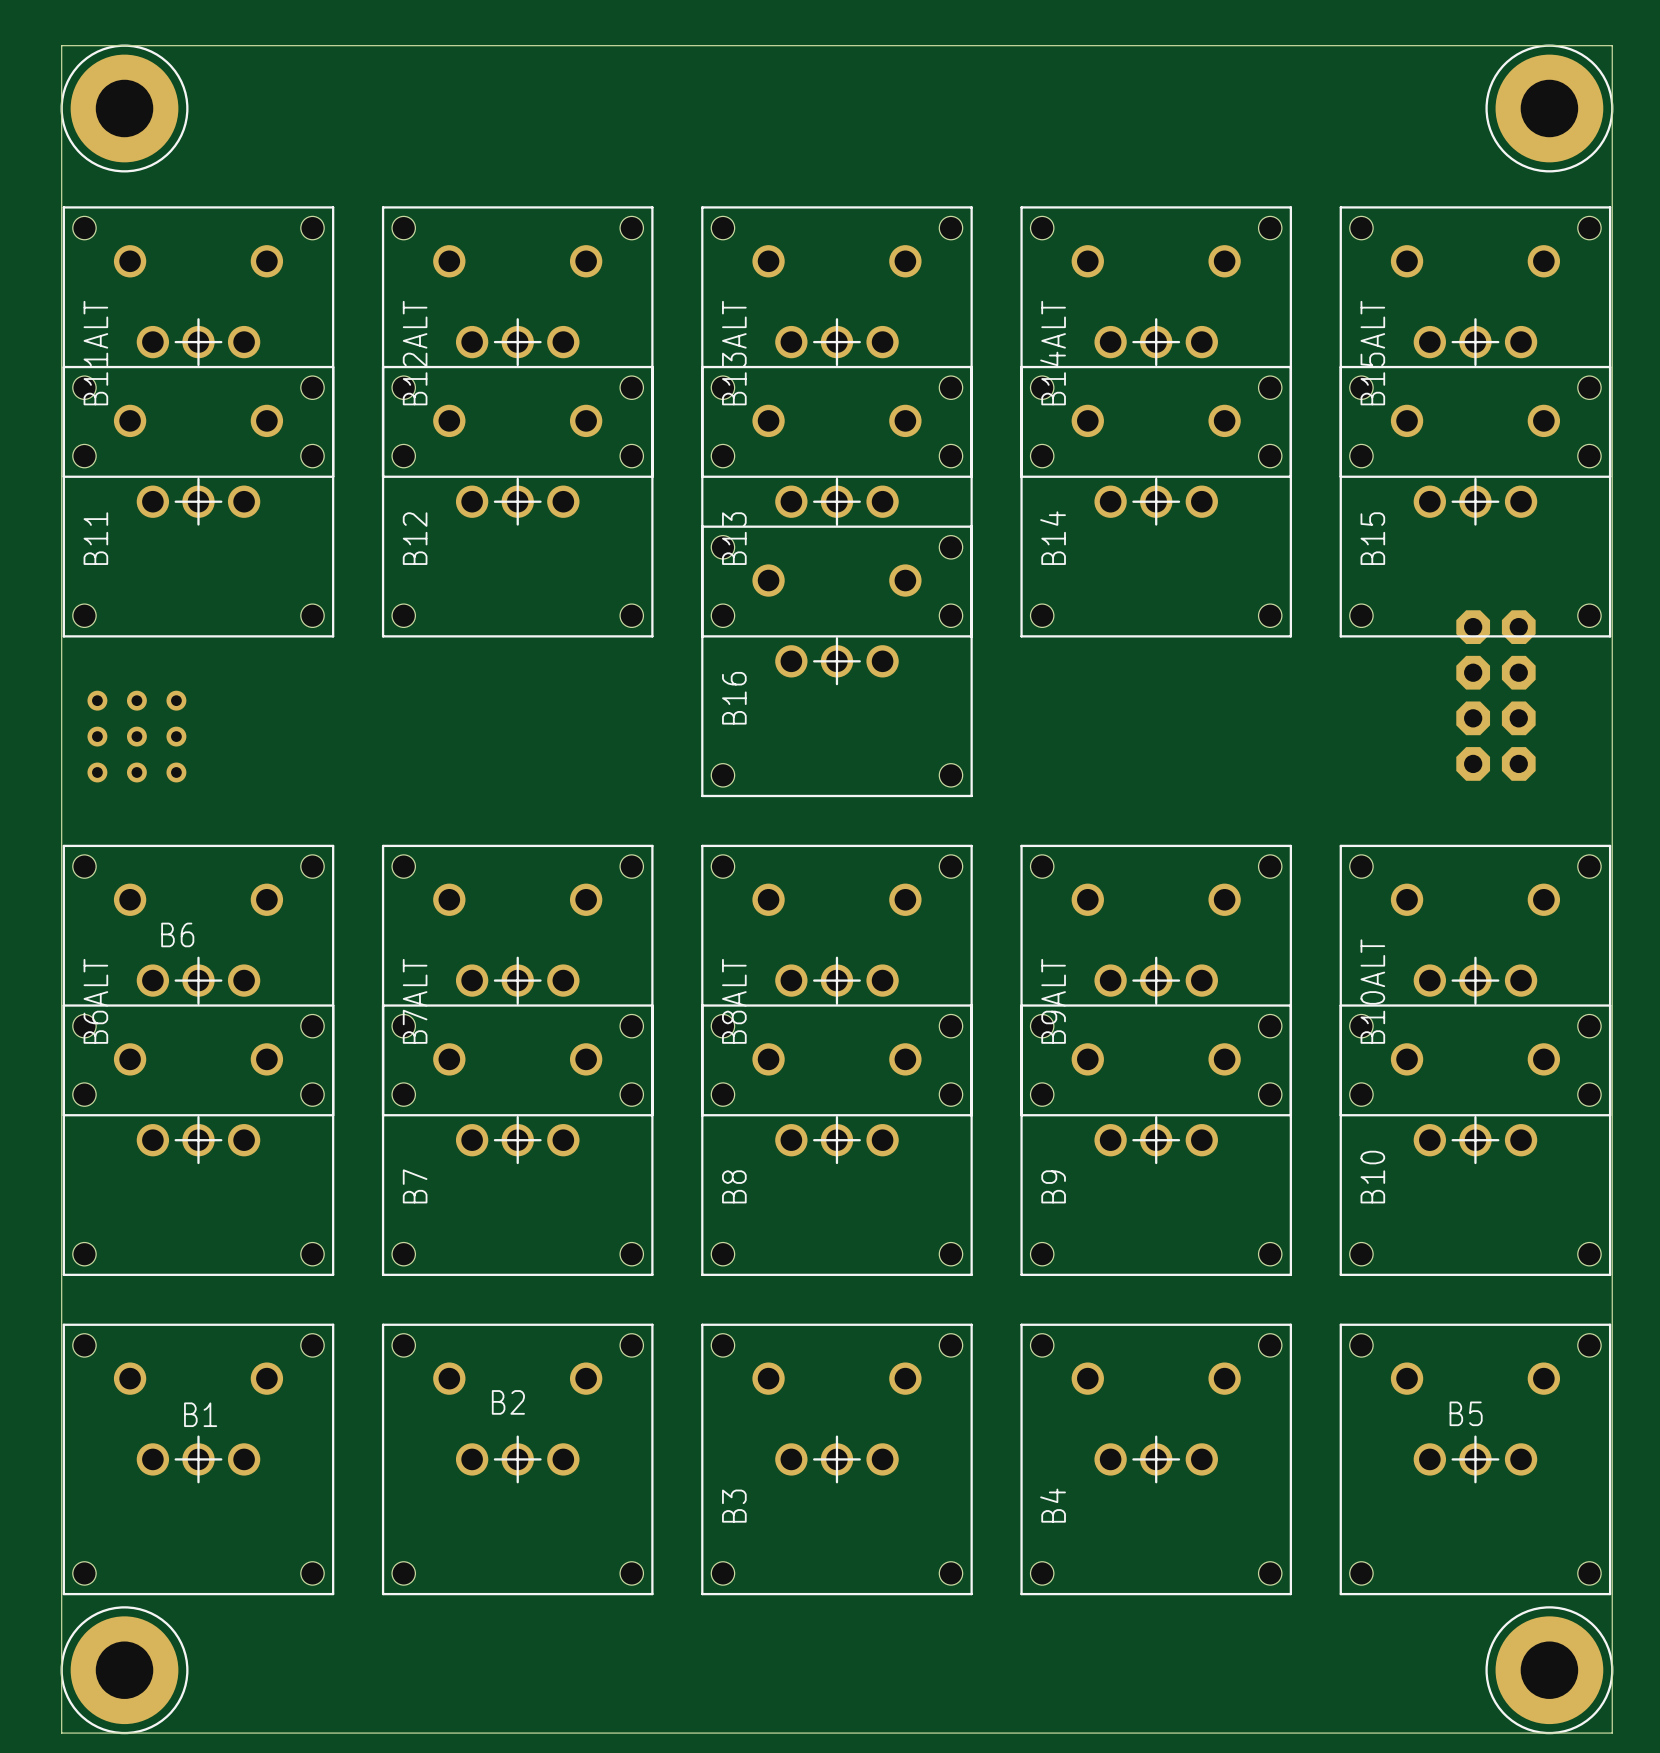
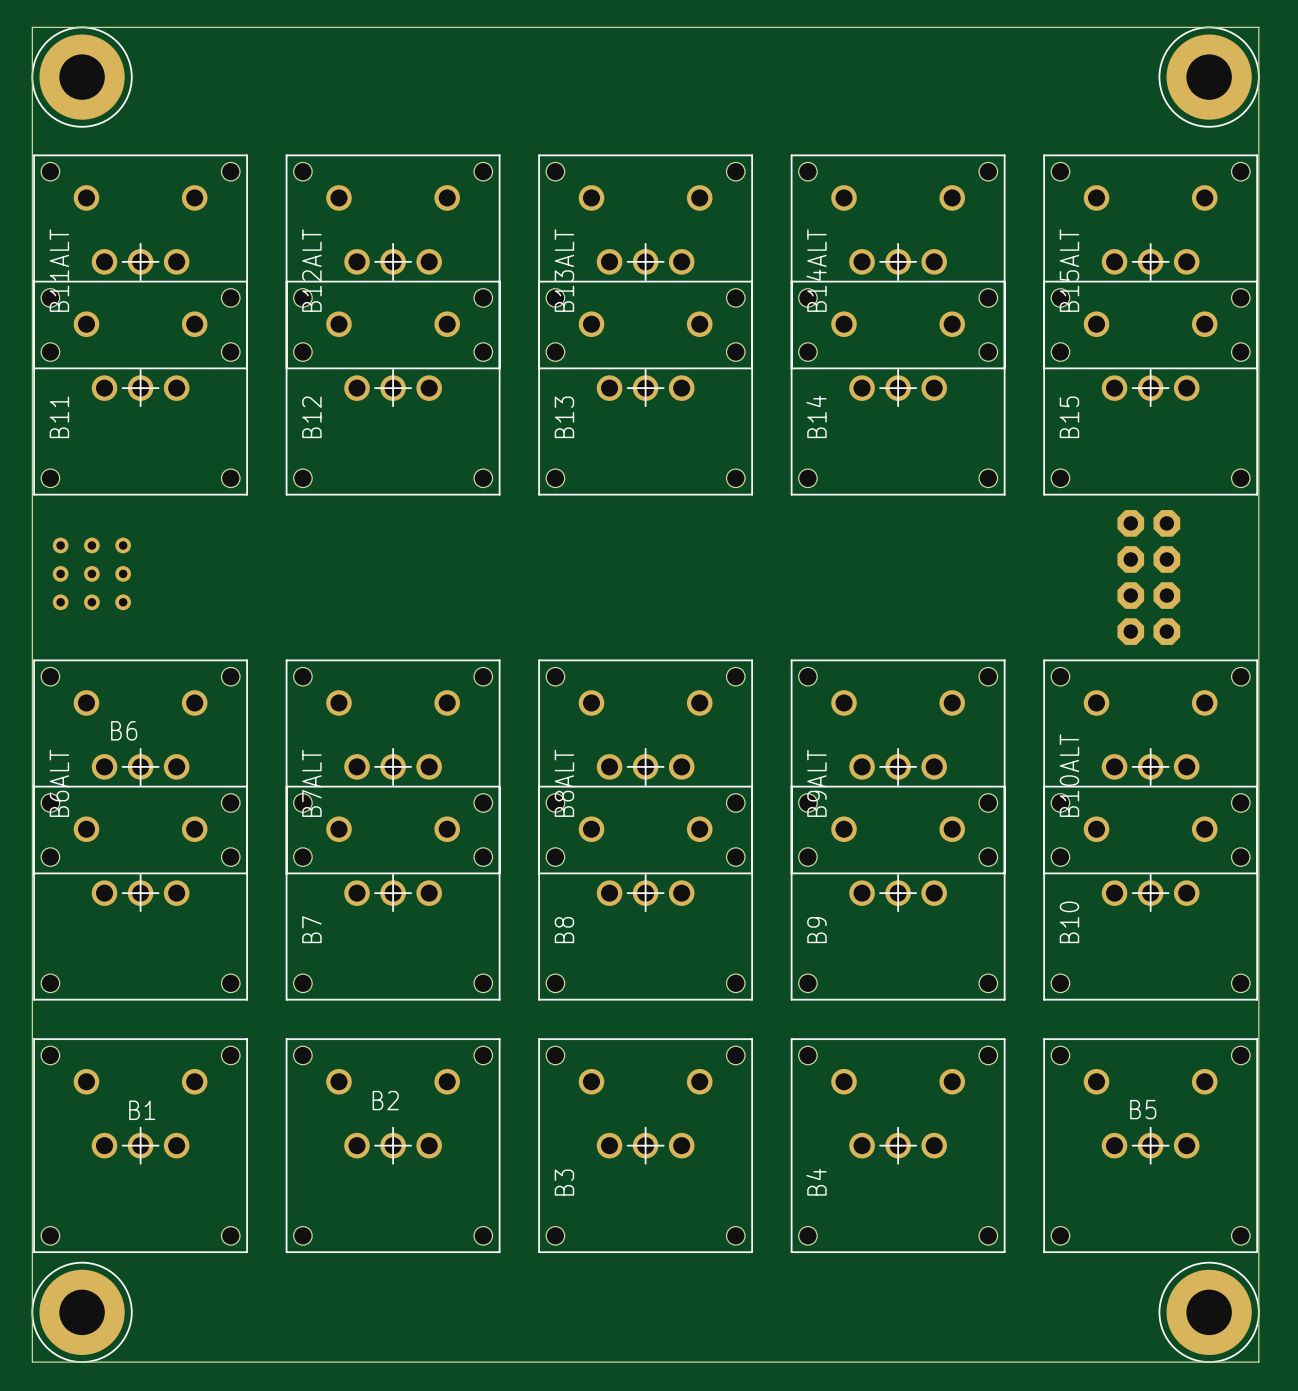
B16: (836, 661) -> none
part position: (1495, 695) -> (1148, 577)

